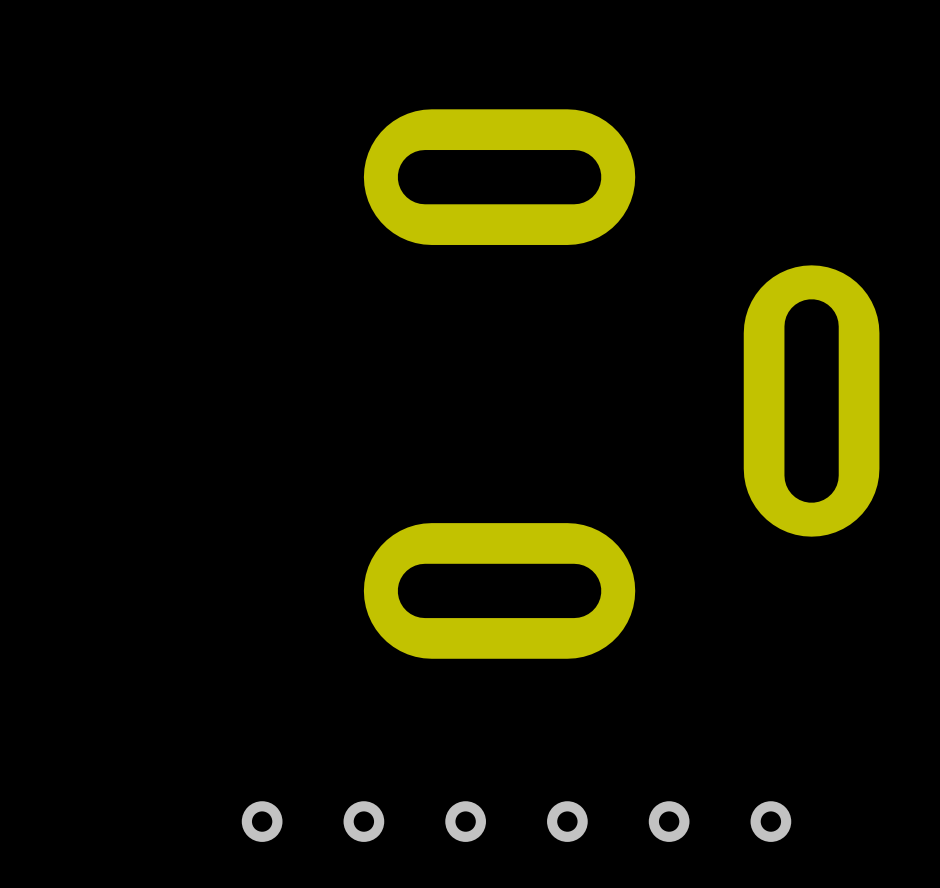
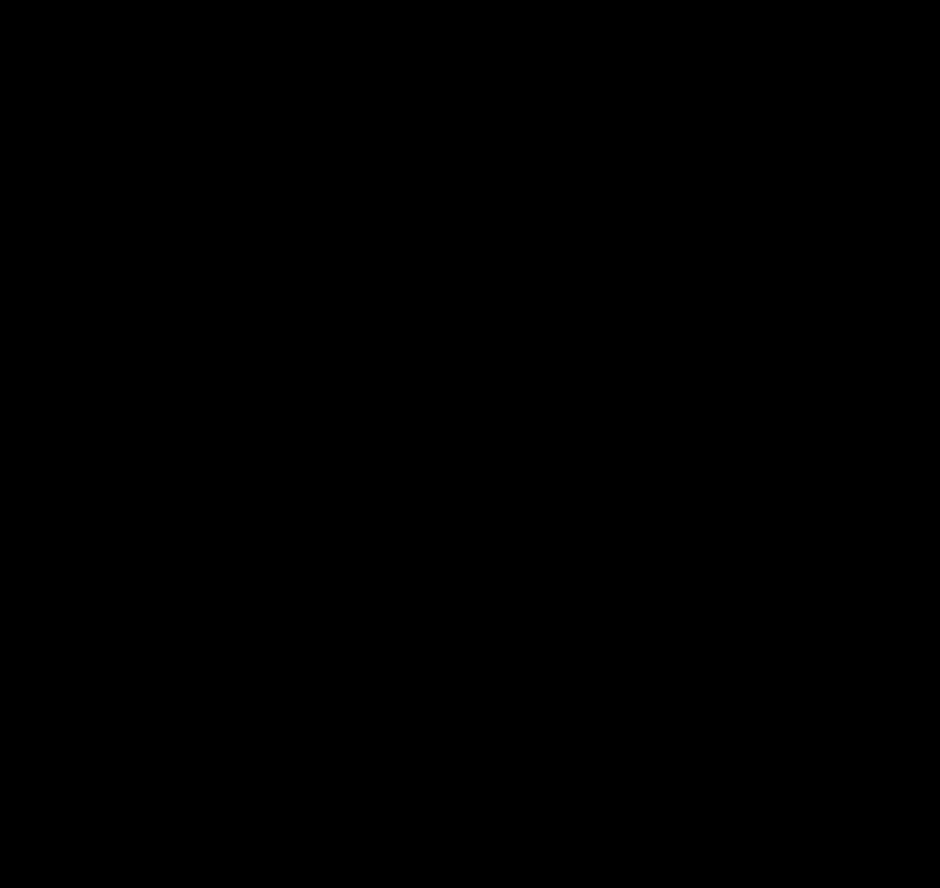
part: (621, 384) -> none
via: (262, 821) -> none
via: (363, 821) -> none
via: (465, 821) -> none
via: (567, 821) -> none
via: (669, 821) -> none
via: (770, 821) -> none

